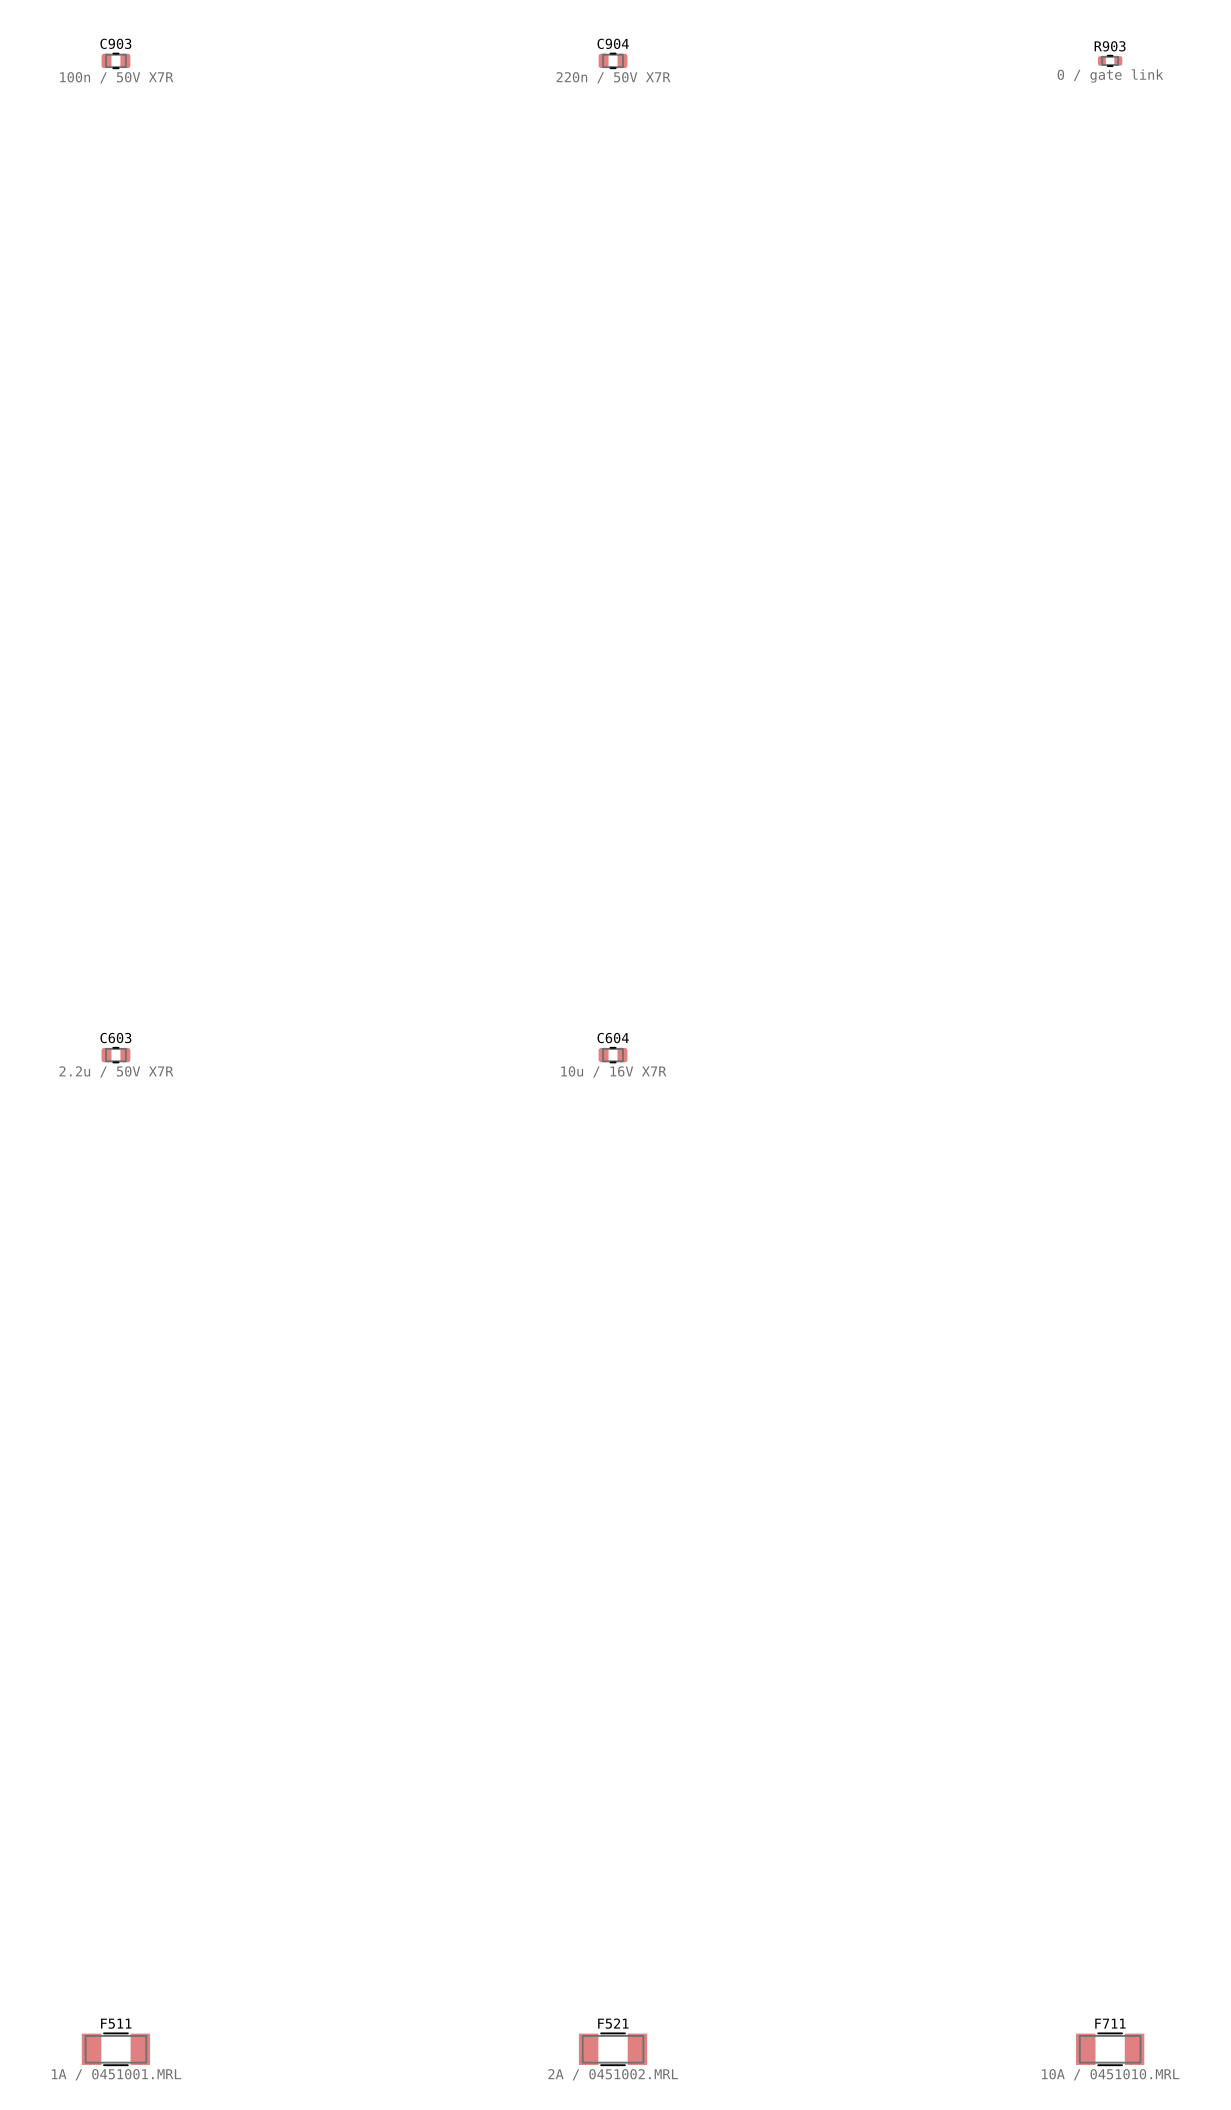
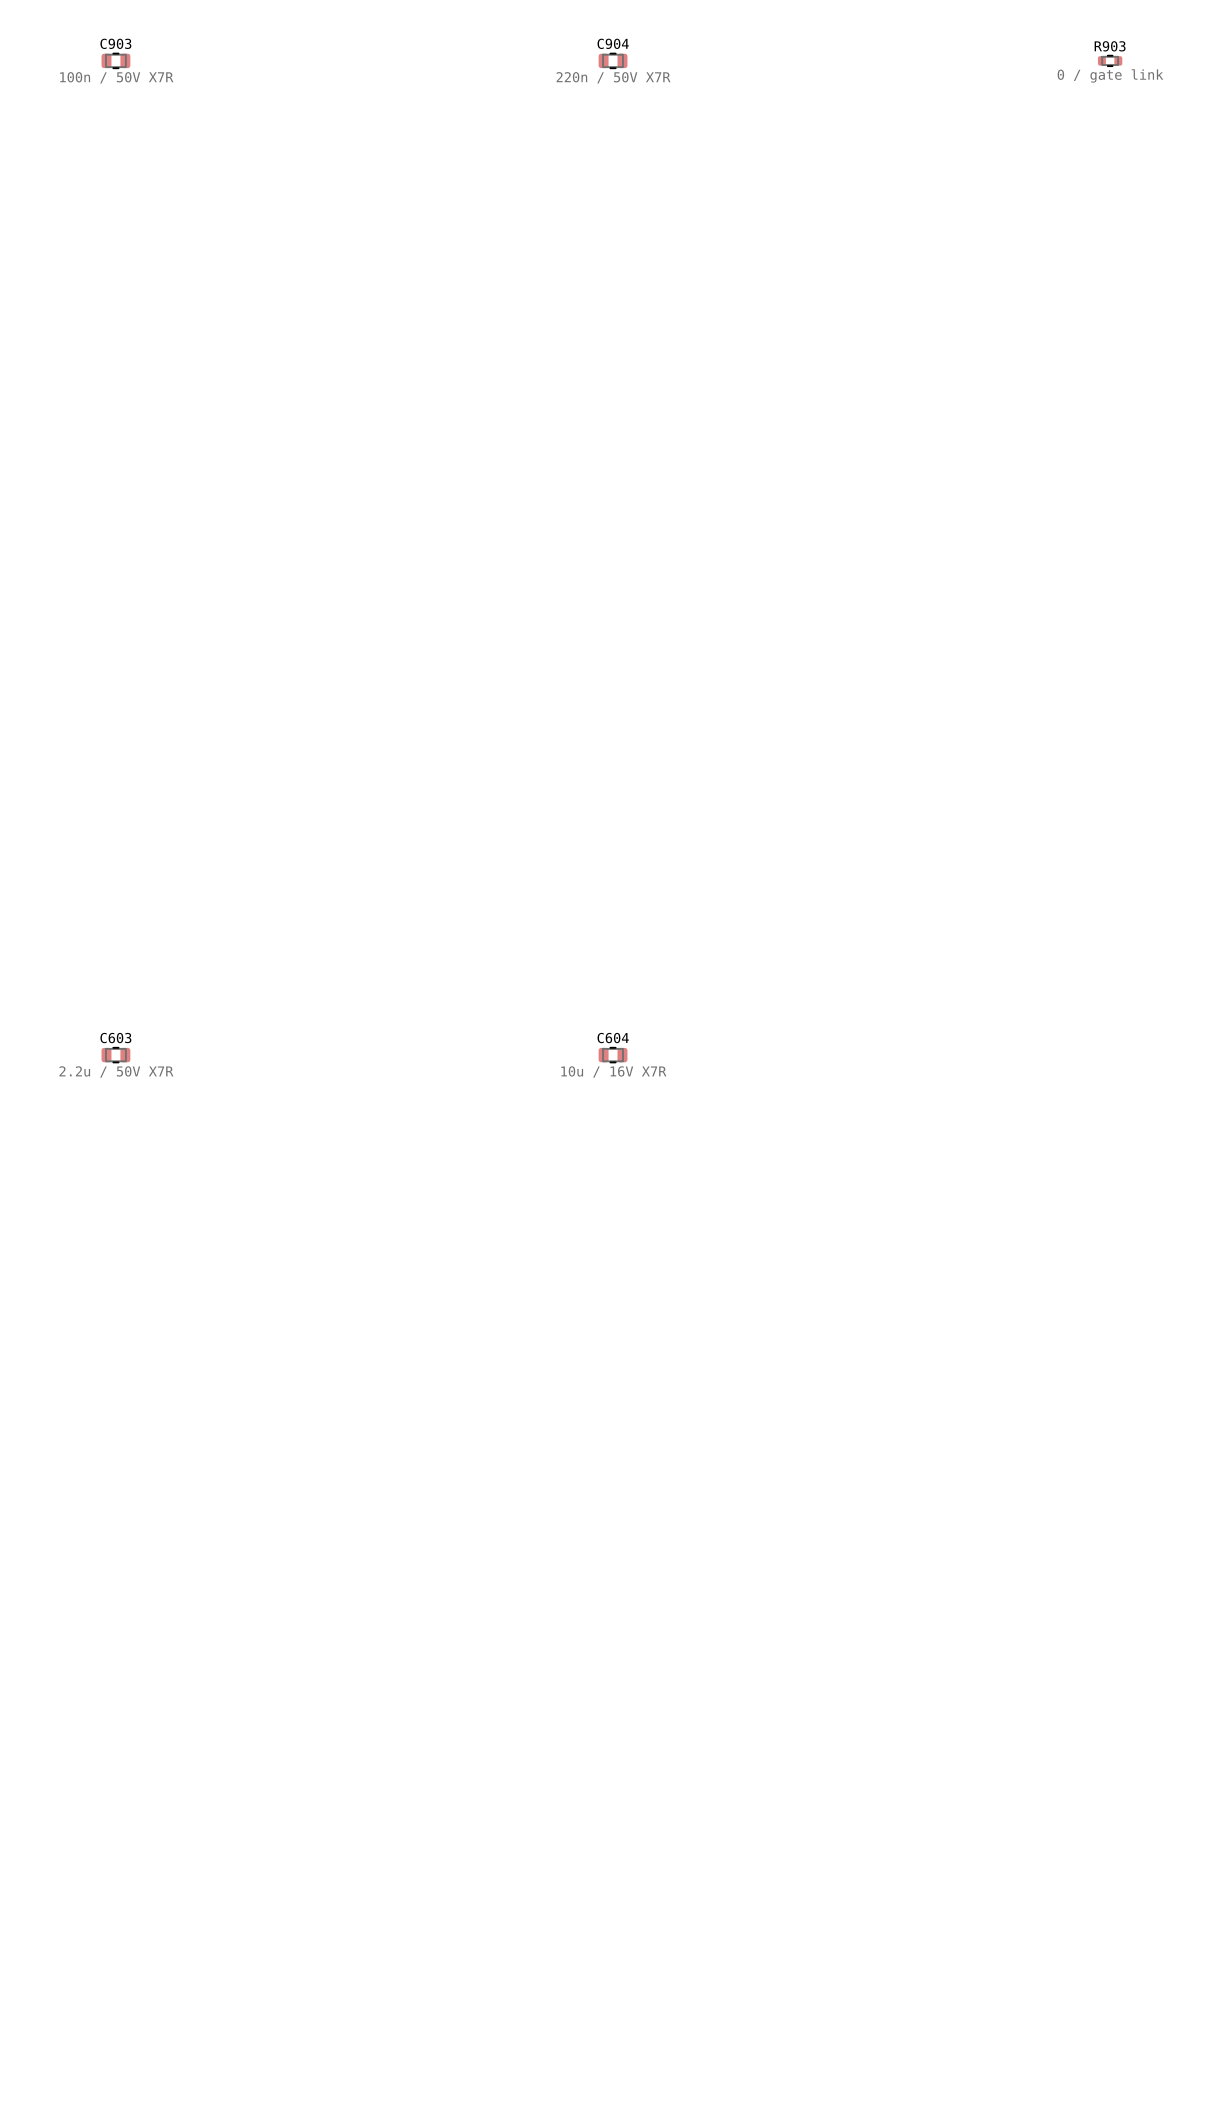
F511: 1A / 0451001.MRL (115, 2049) -> none
F521: 2A / 0451002.MRL (613, 2049) -> none
F711: 10A / 0451010.MRL (1110, 2049) -> none

